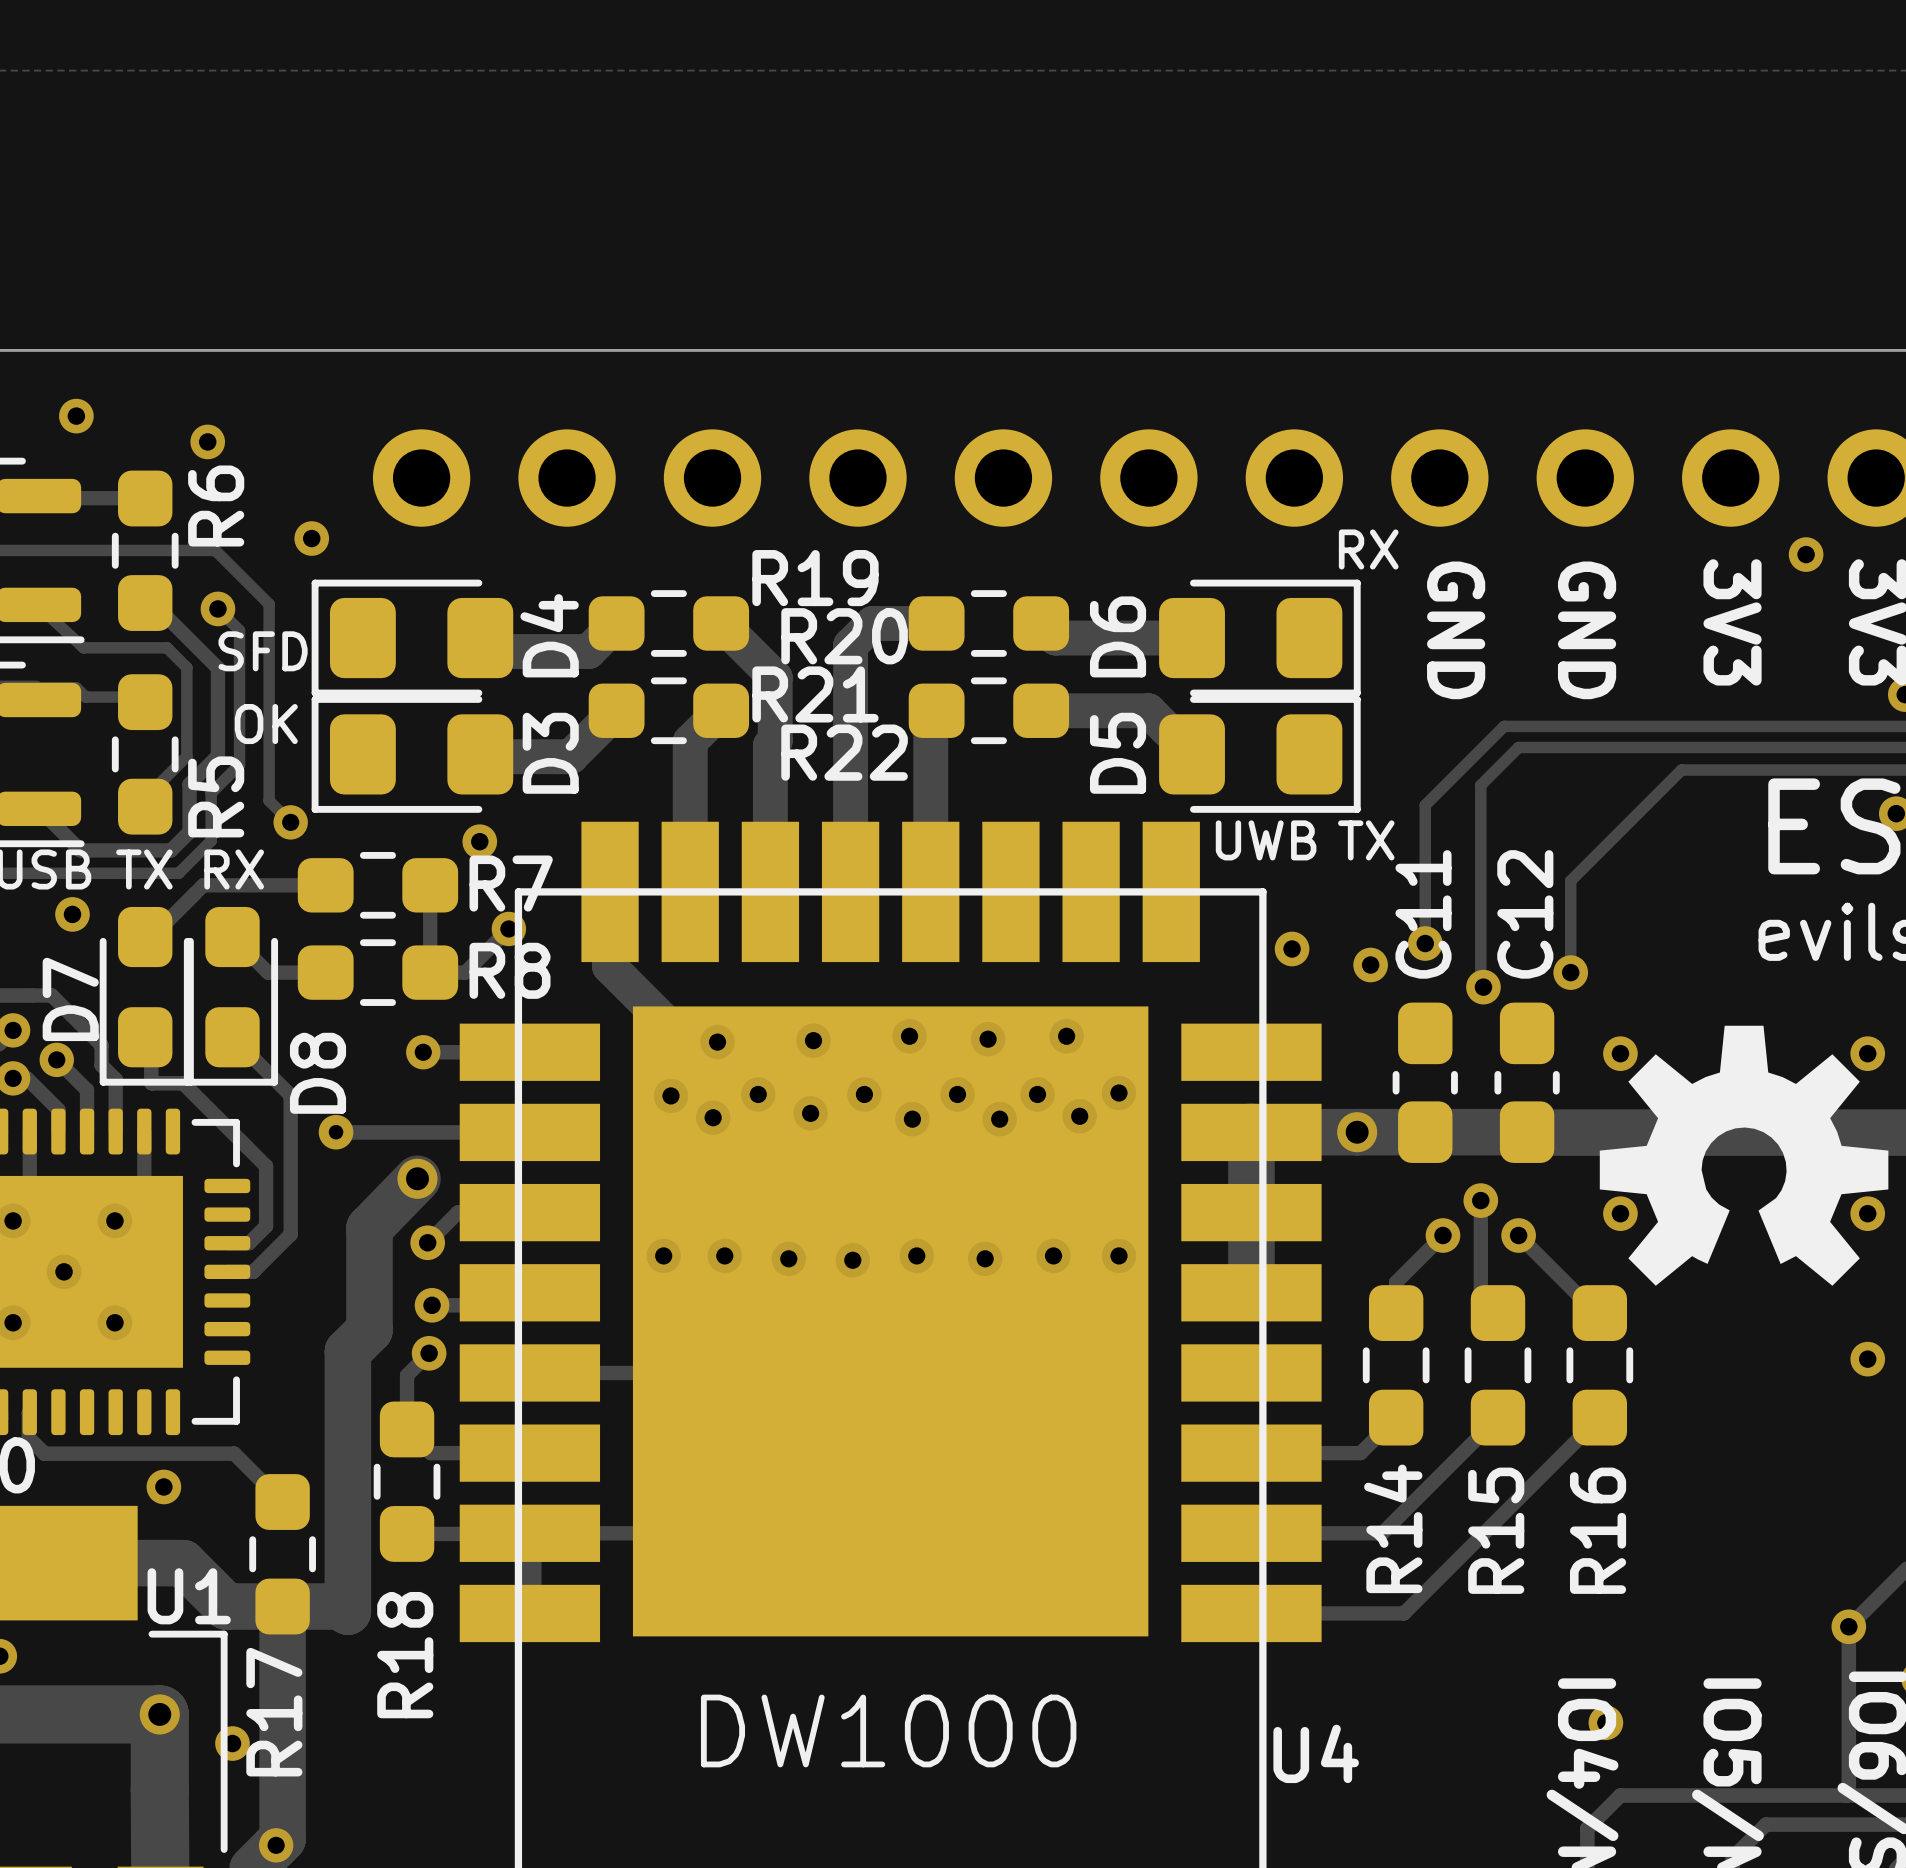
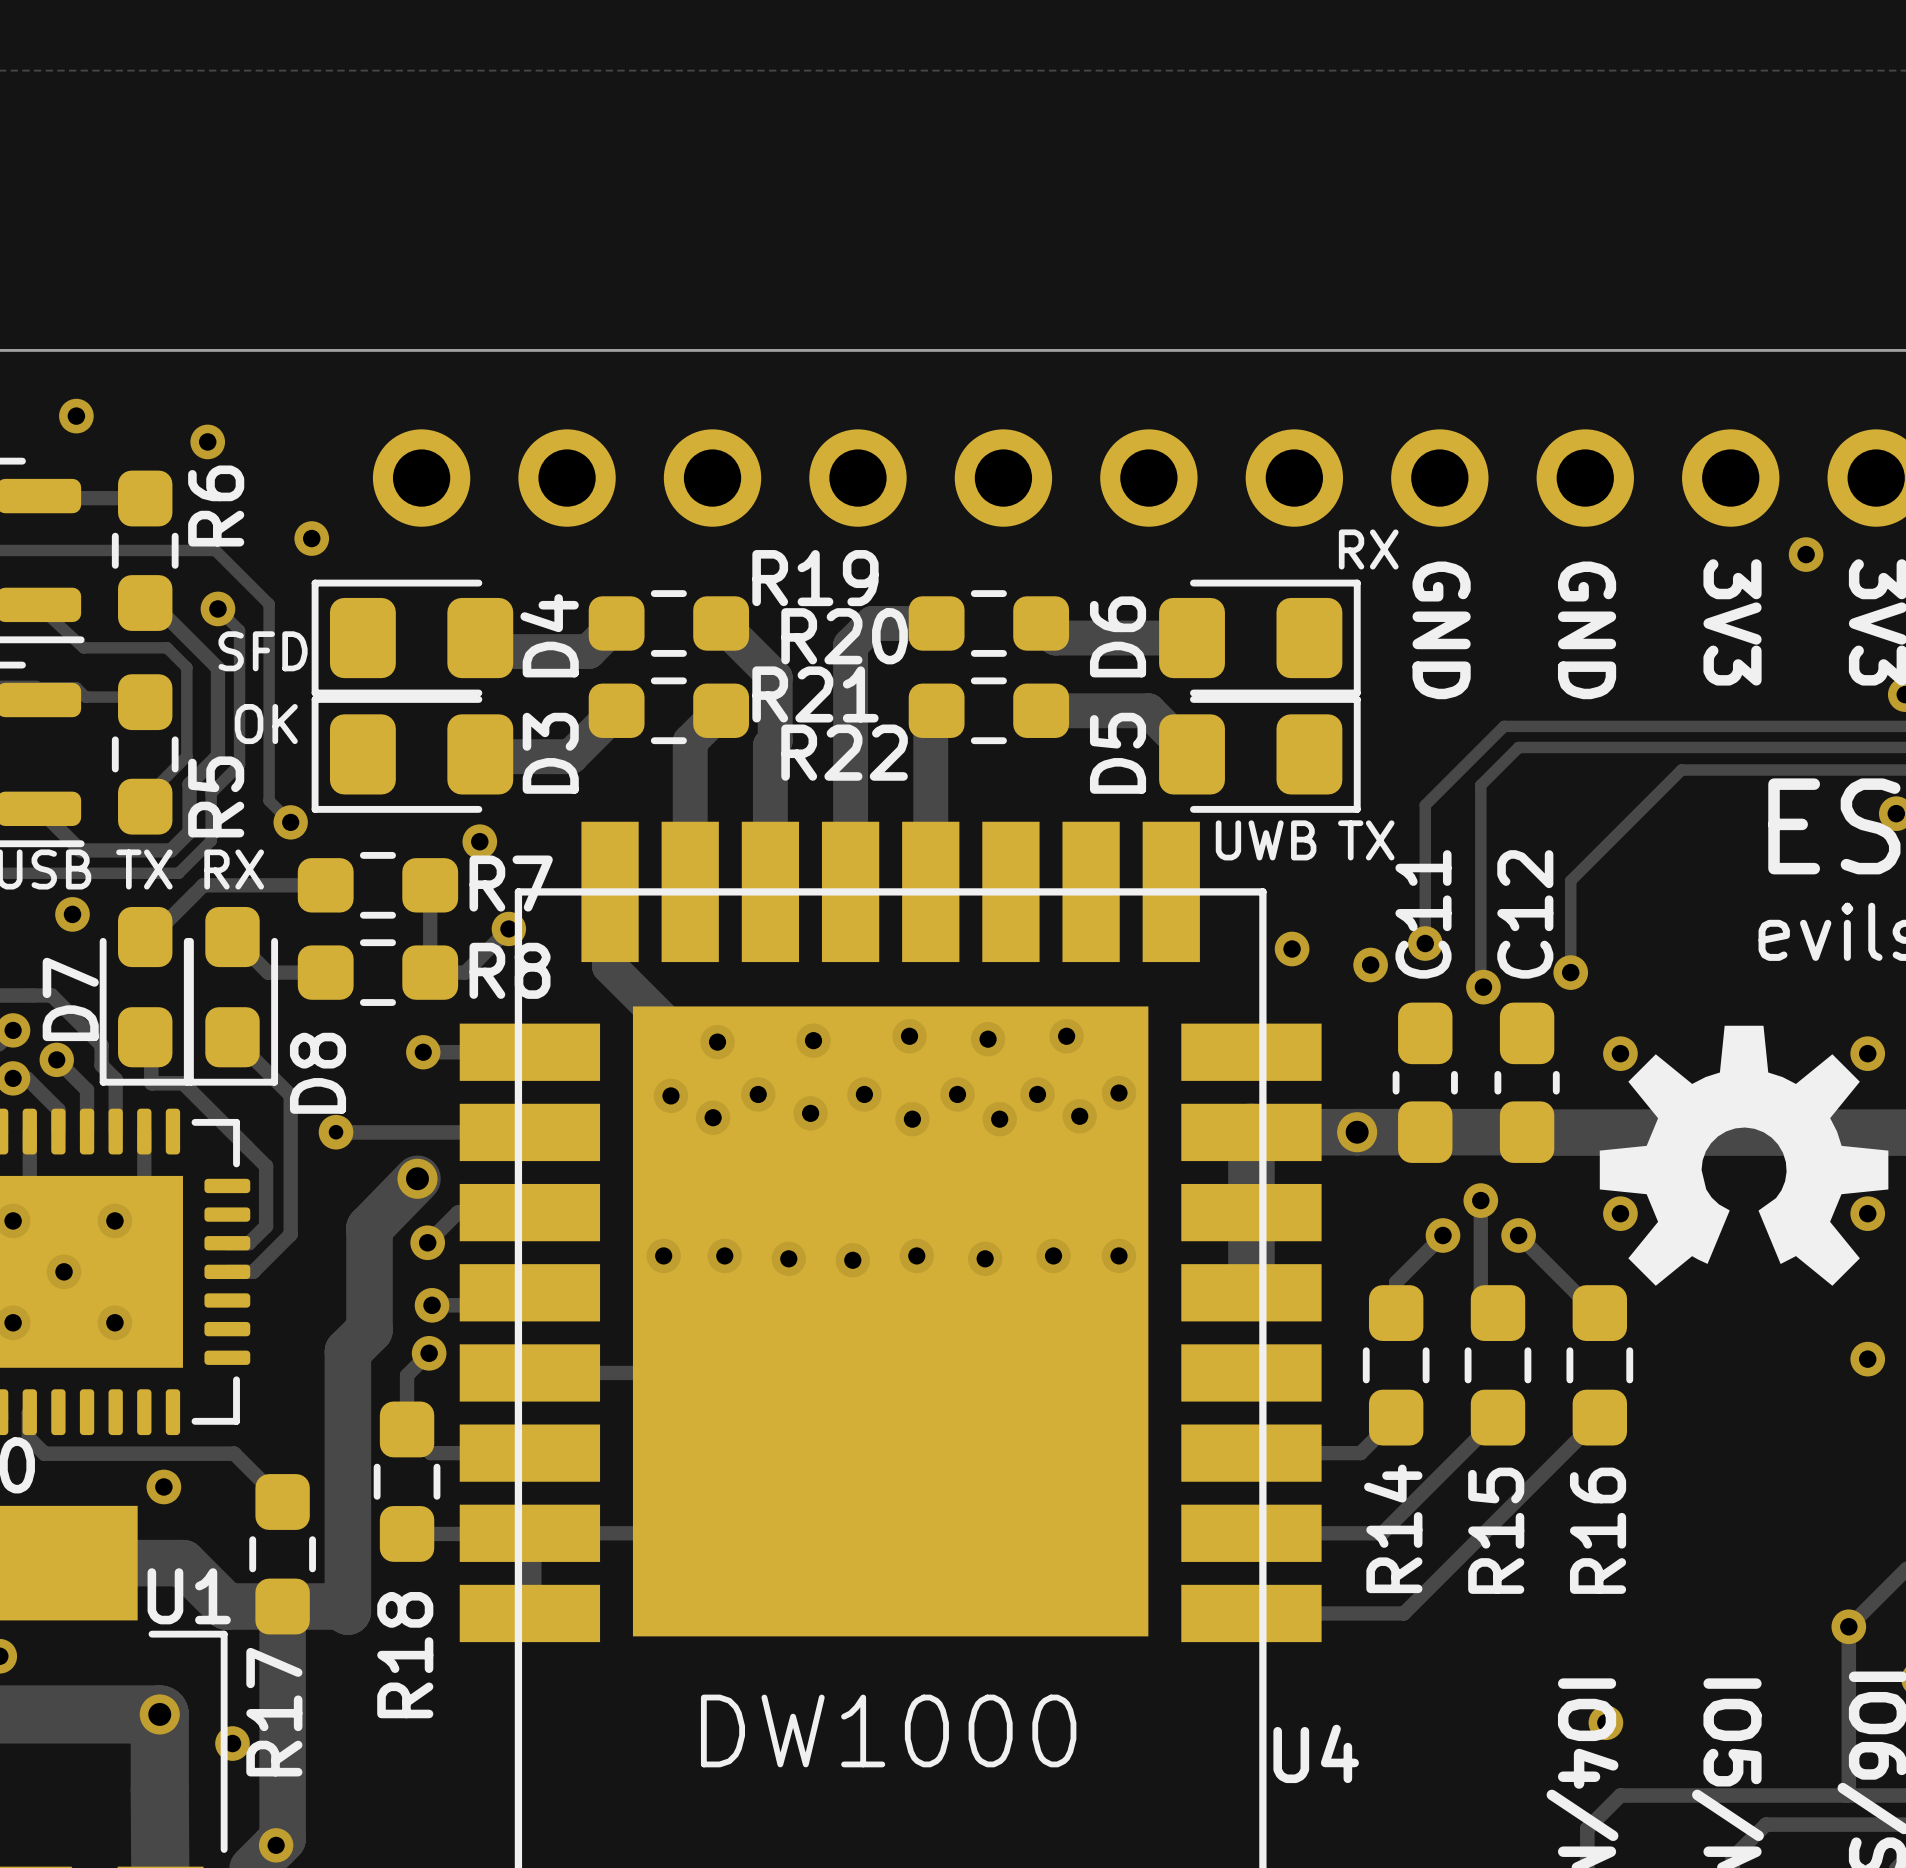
text position: GND (1456, 630) -> GND (1441, 630)

